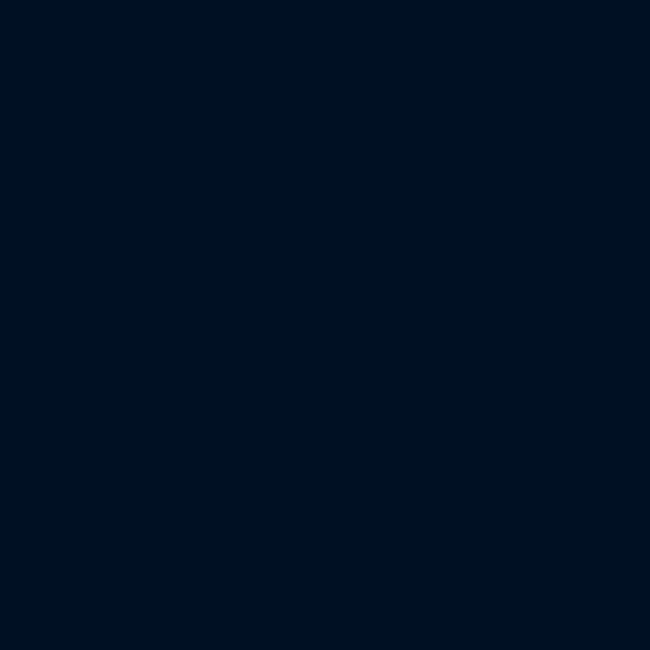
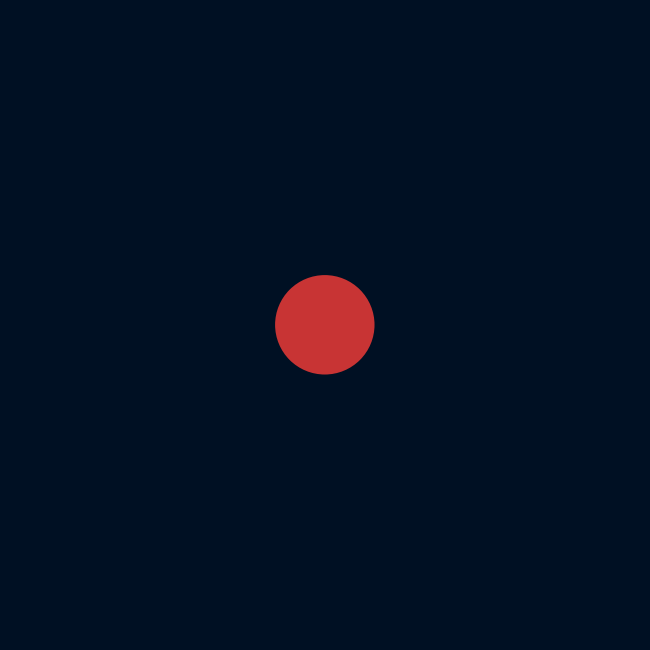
part: none -> (324, 324)

